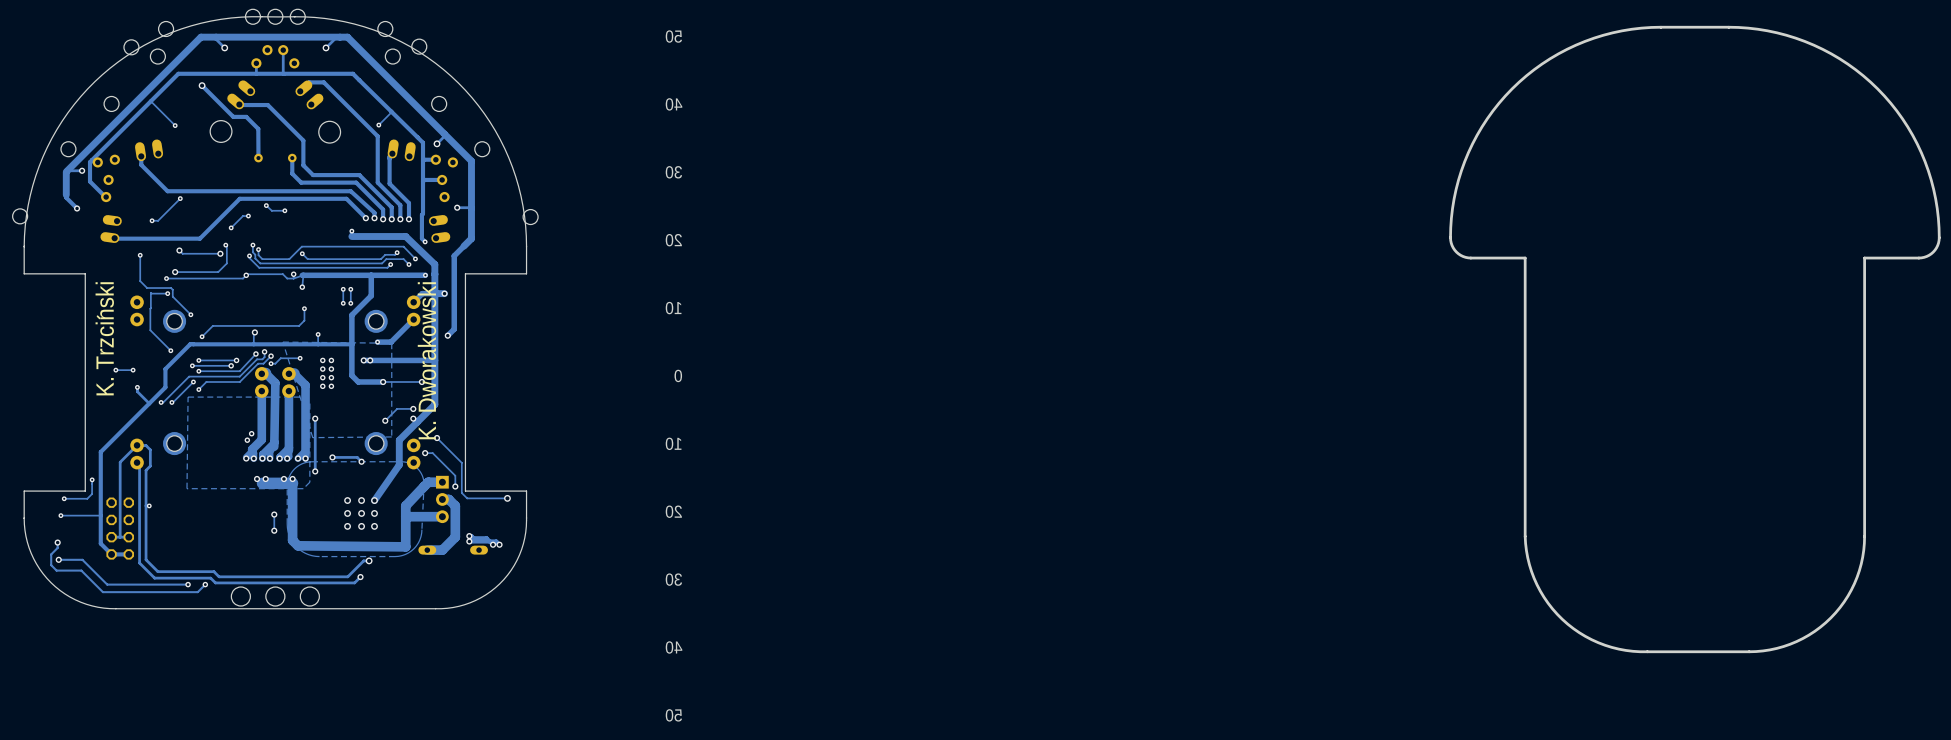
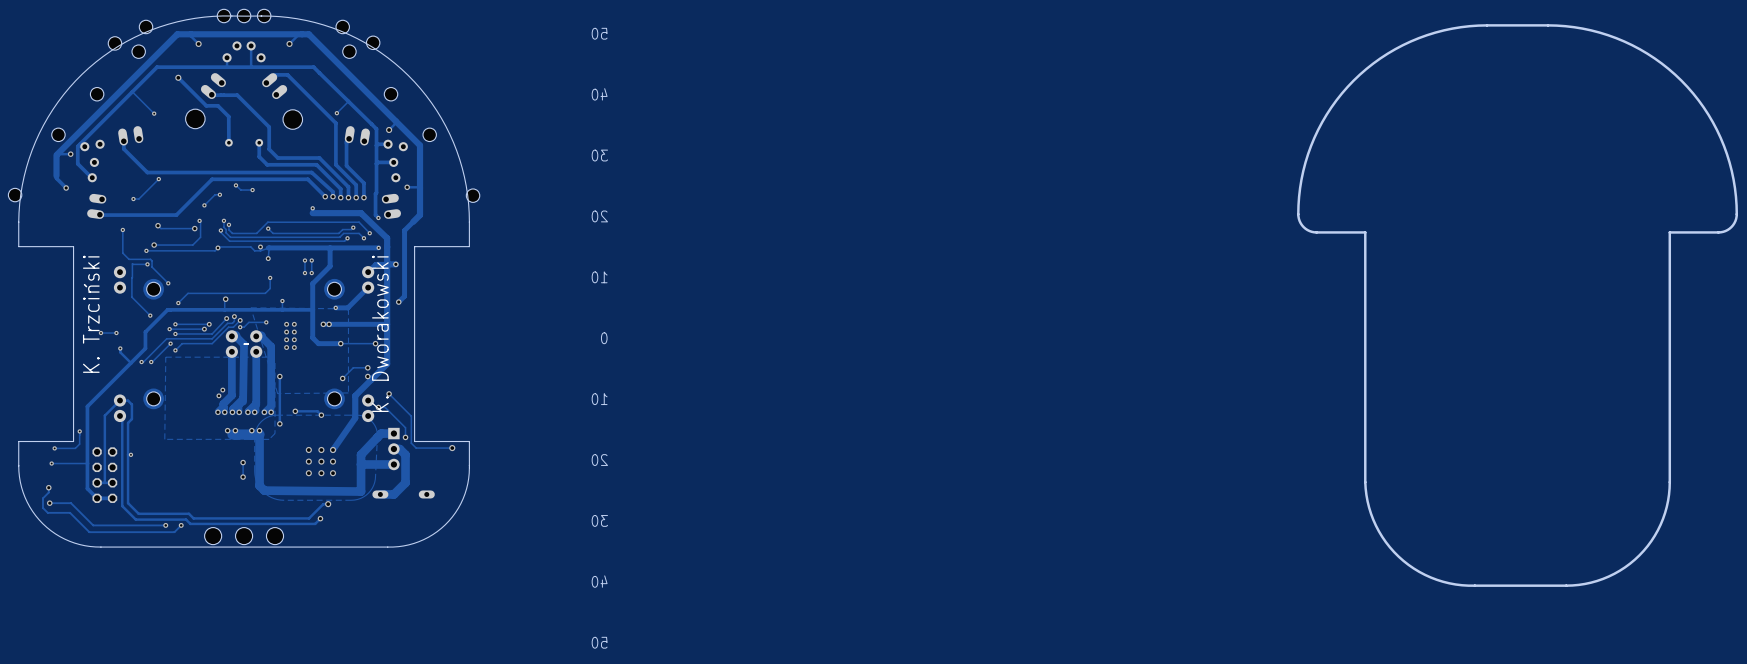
track: (469, 536) (473, 538) (486, 538) (493, 544) -> none
via: (469, 536) -> none
track: (469, 541) (496, 541) (499, 544) -> none
via: (469, 541) -> none
via: (493, 544) -> none
via: (499, 544) -> none

